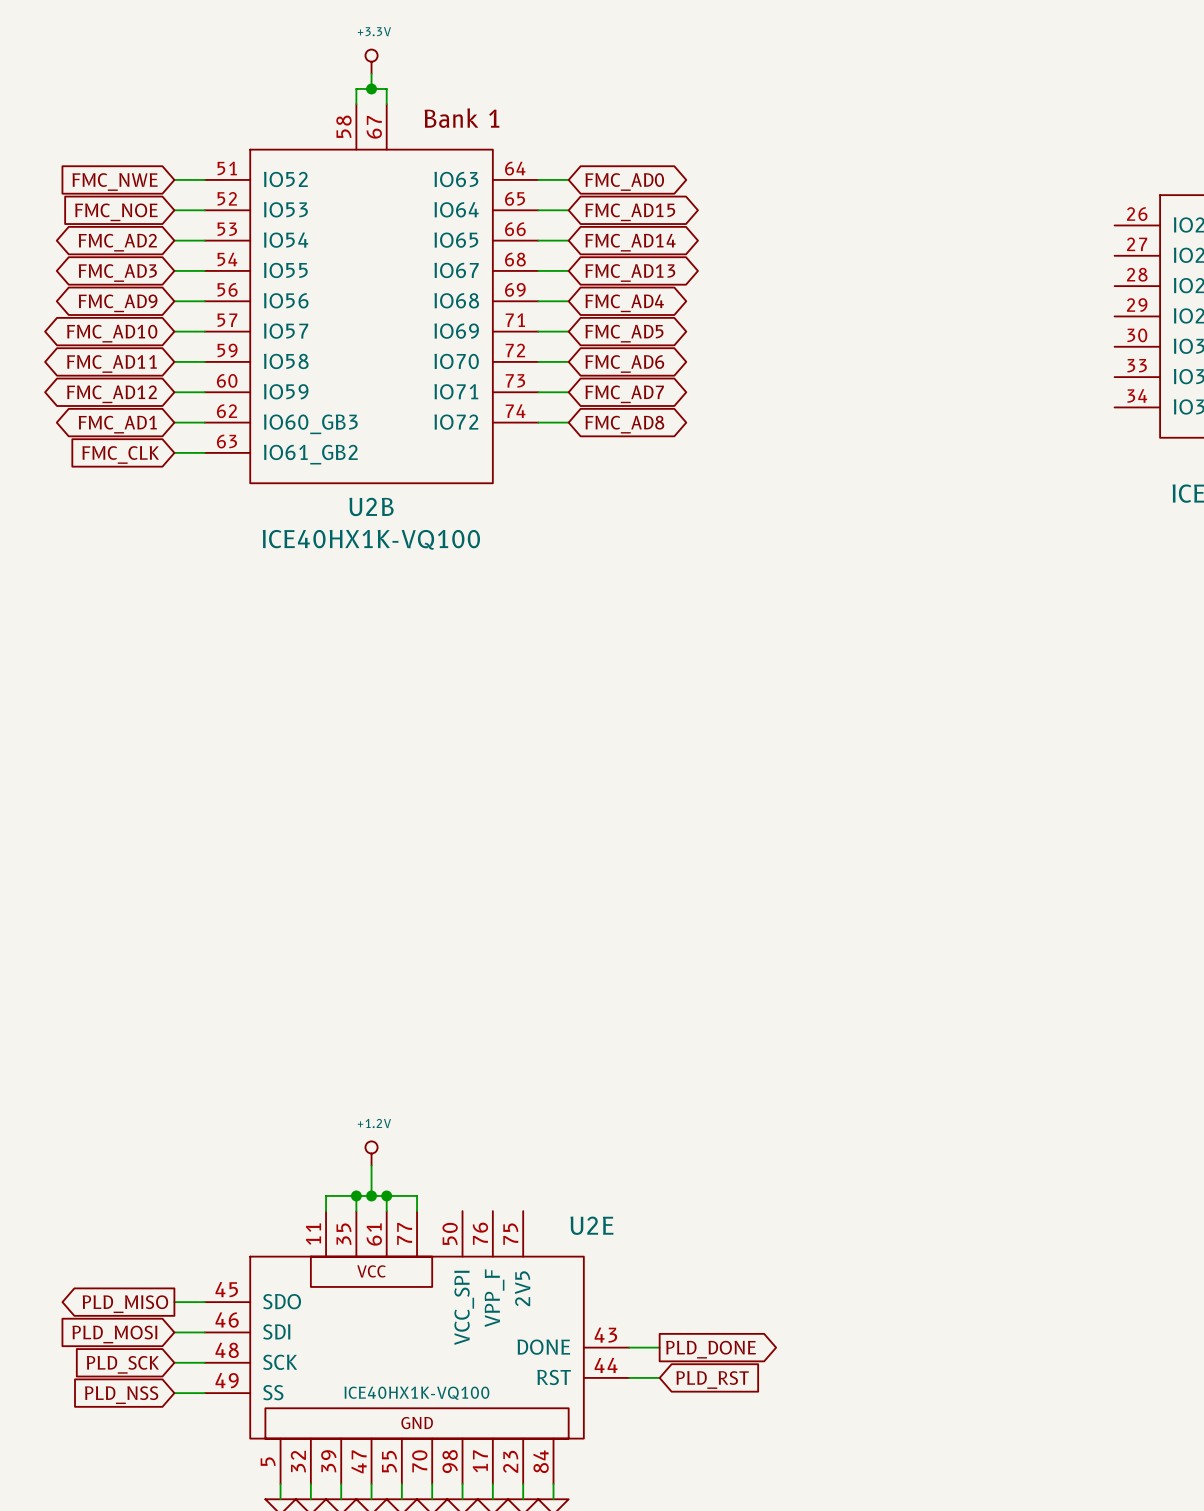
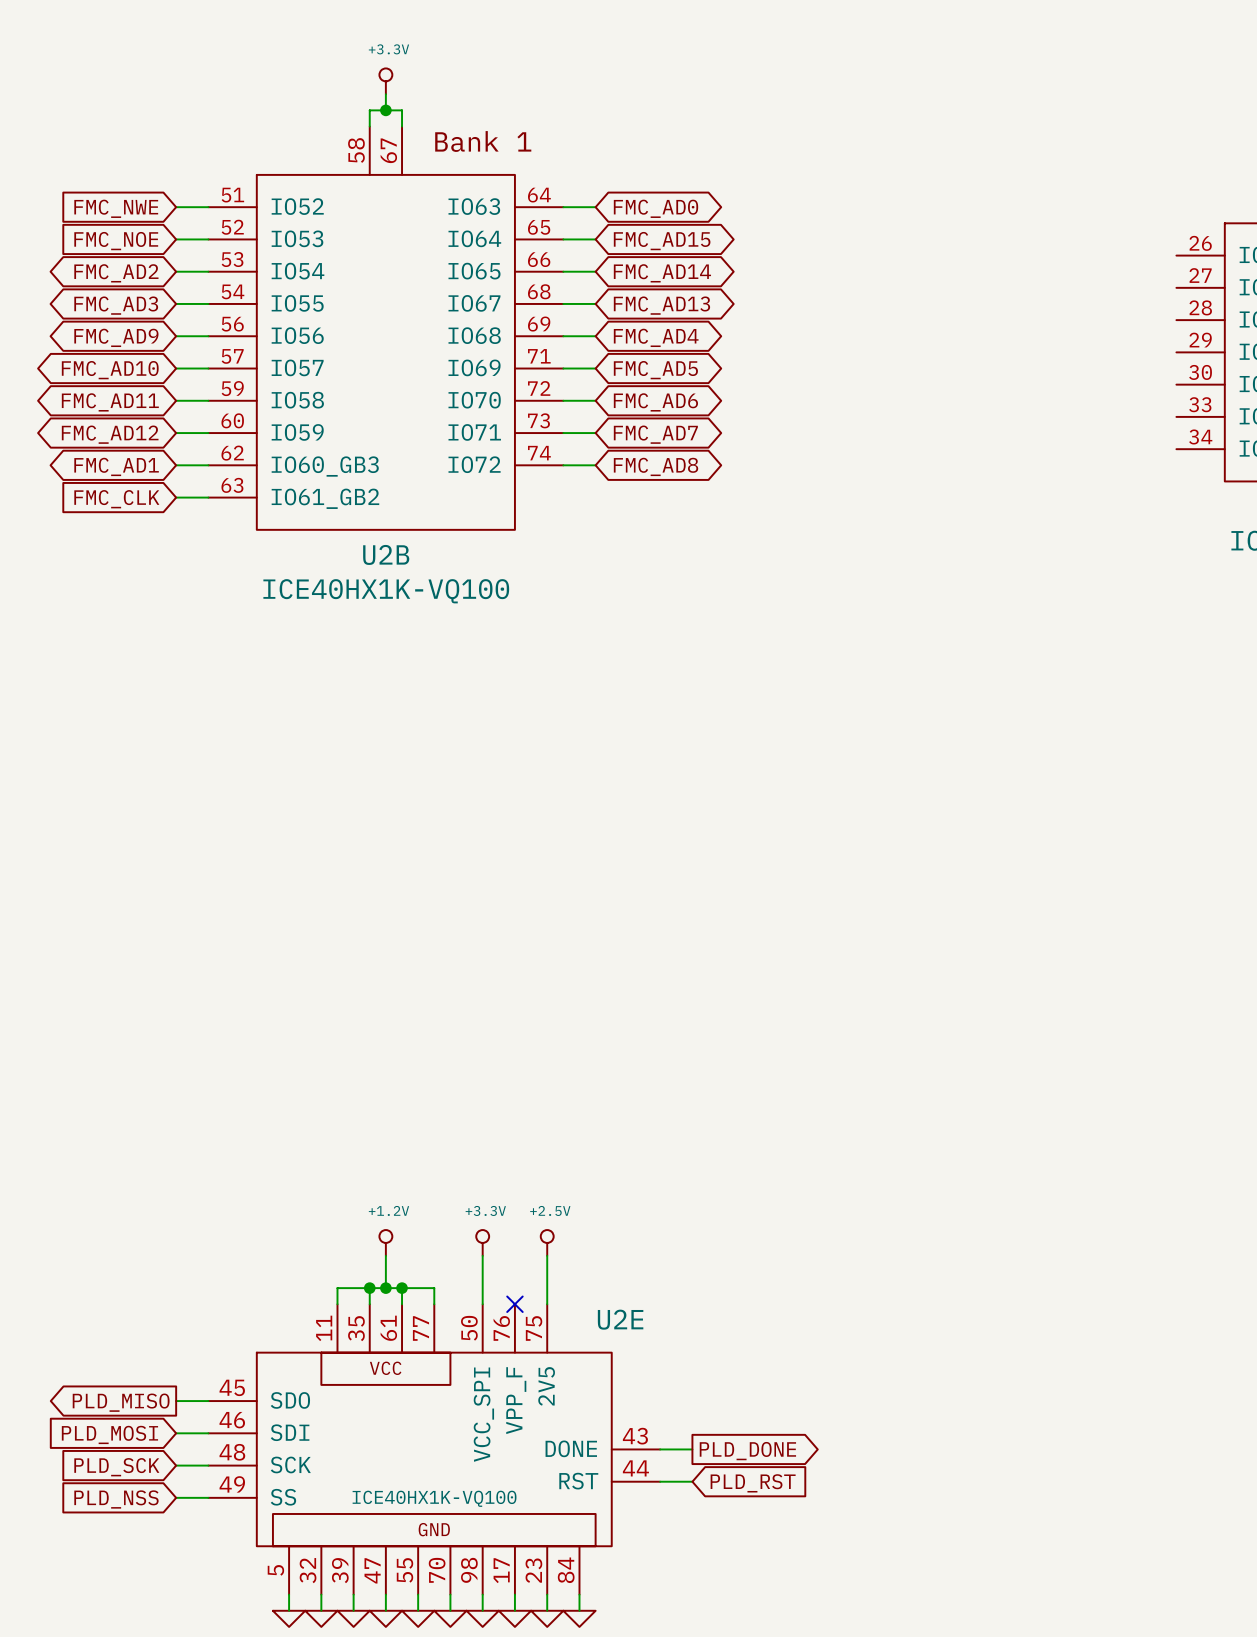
power symbol: none -> +3.3V (482, 1242)
power symbol: none -> +2.5V (547, 1242)
wire: none -> (482, 1255) (482, 1304)
wire: none -> (547, 1255) (547, 1304)
no-connect mark: none -> (514, 1304)

